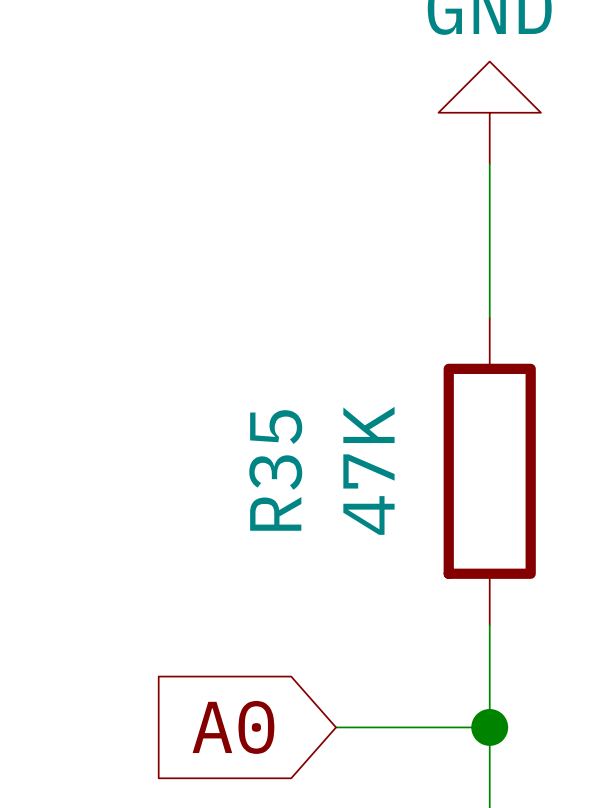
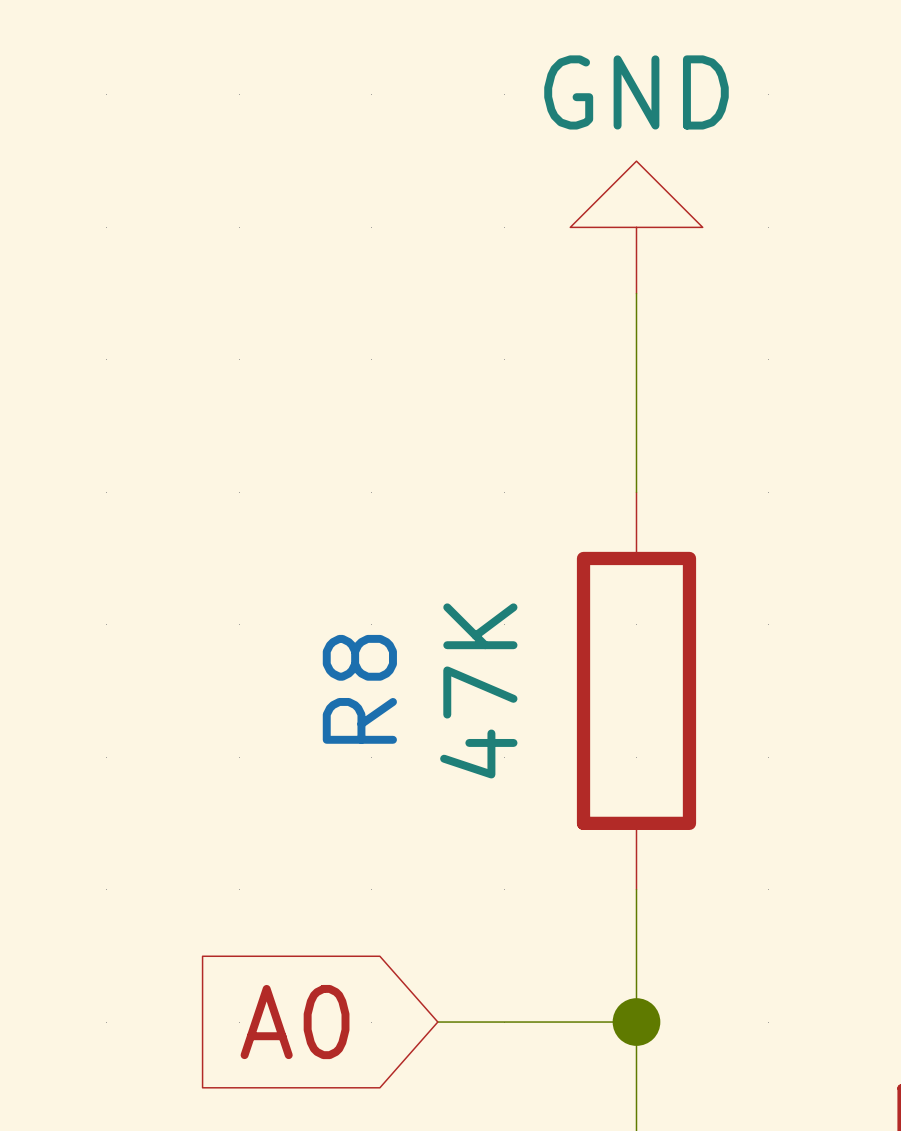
R35 name: R35 (275, 470) -> R8 (359, 689)

